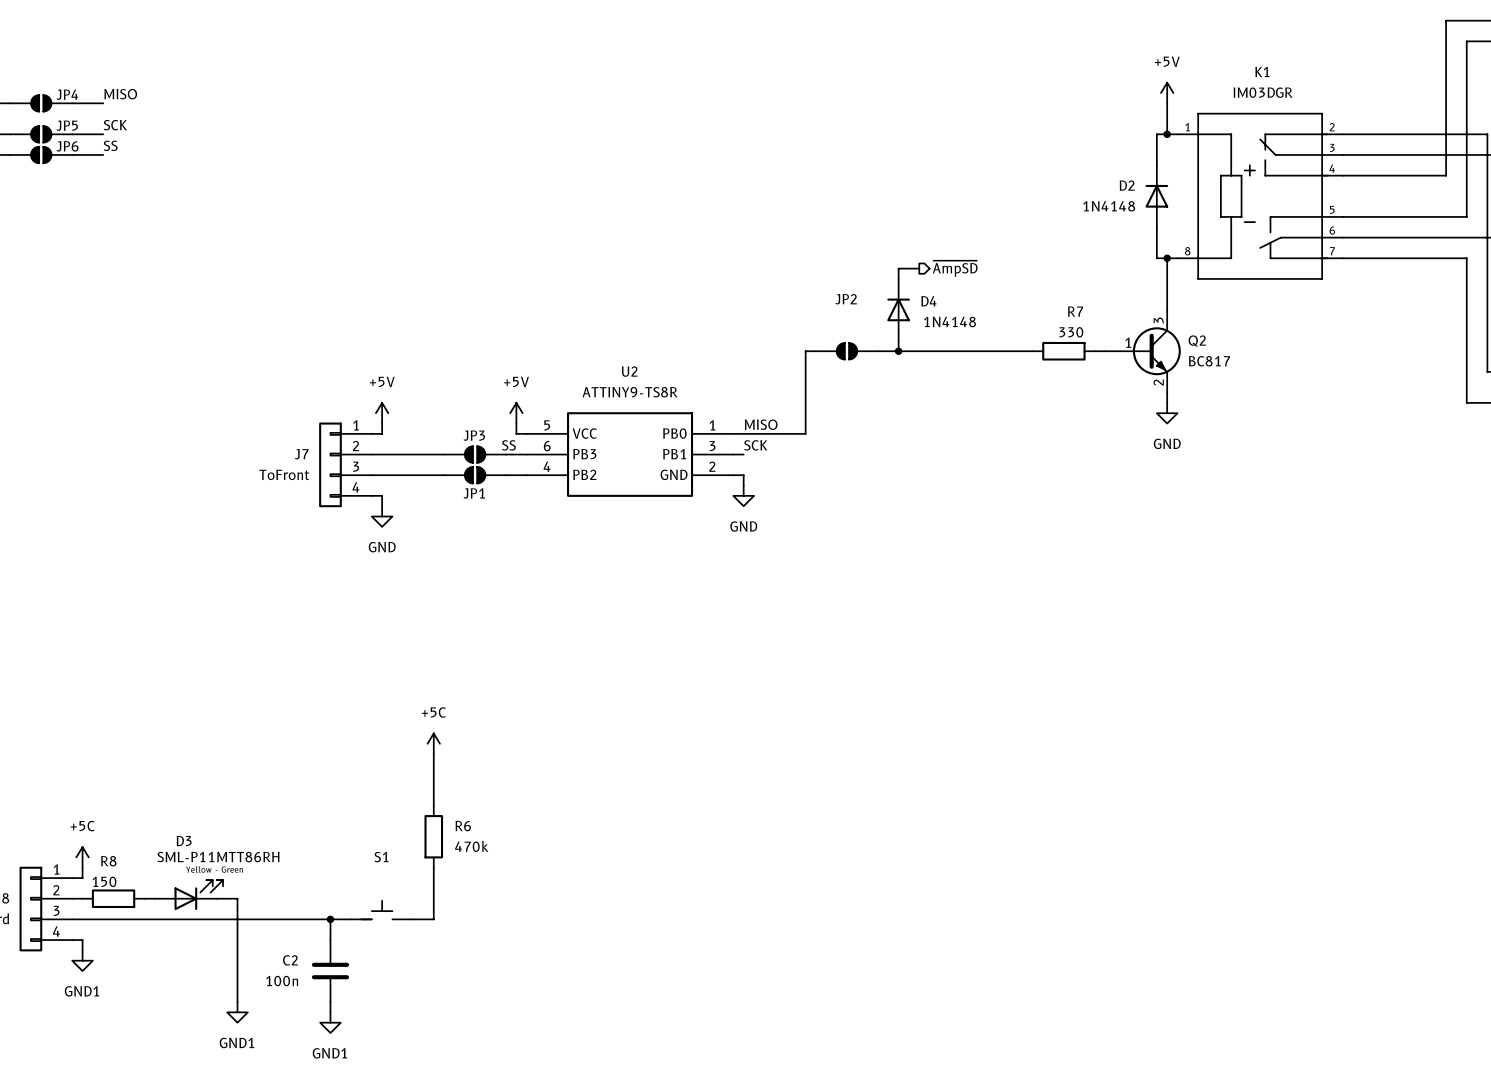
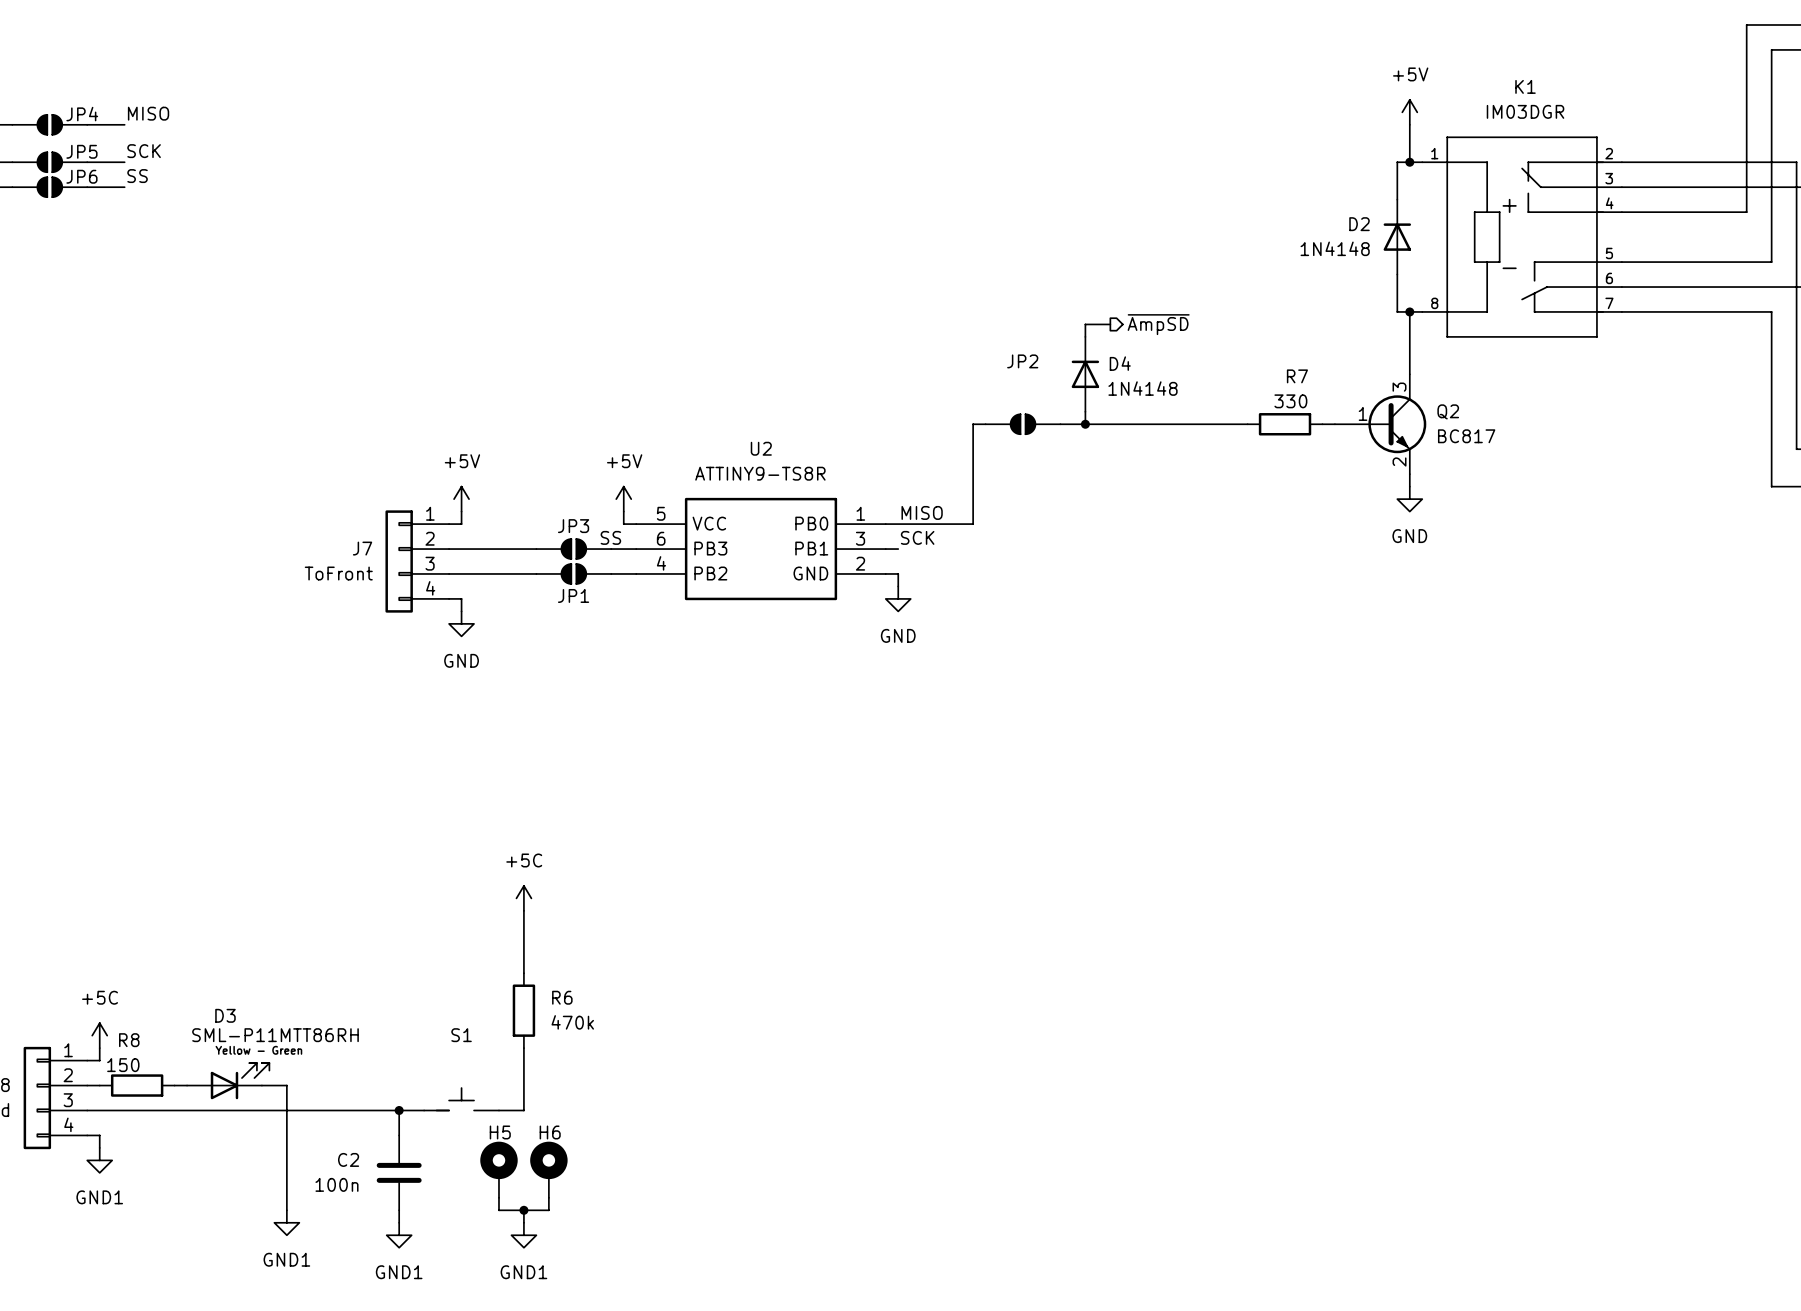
H5: none -> (498, 1169)
H6: none -> (548, 1169)
wire: none -> (498, 1197) (498, 1210) (548, 1210) (548, 1197)
wire: none -> (523, 1210) (523, 1222)
junction: none -> (523, 1210)
power symbol: none -> GND1 (523, 1235)

